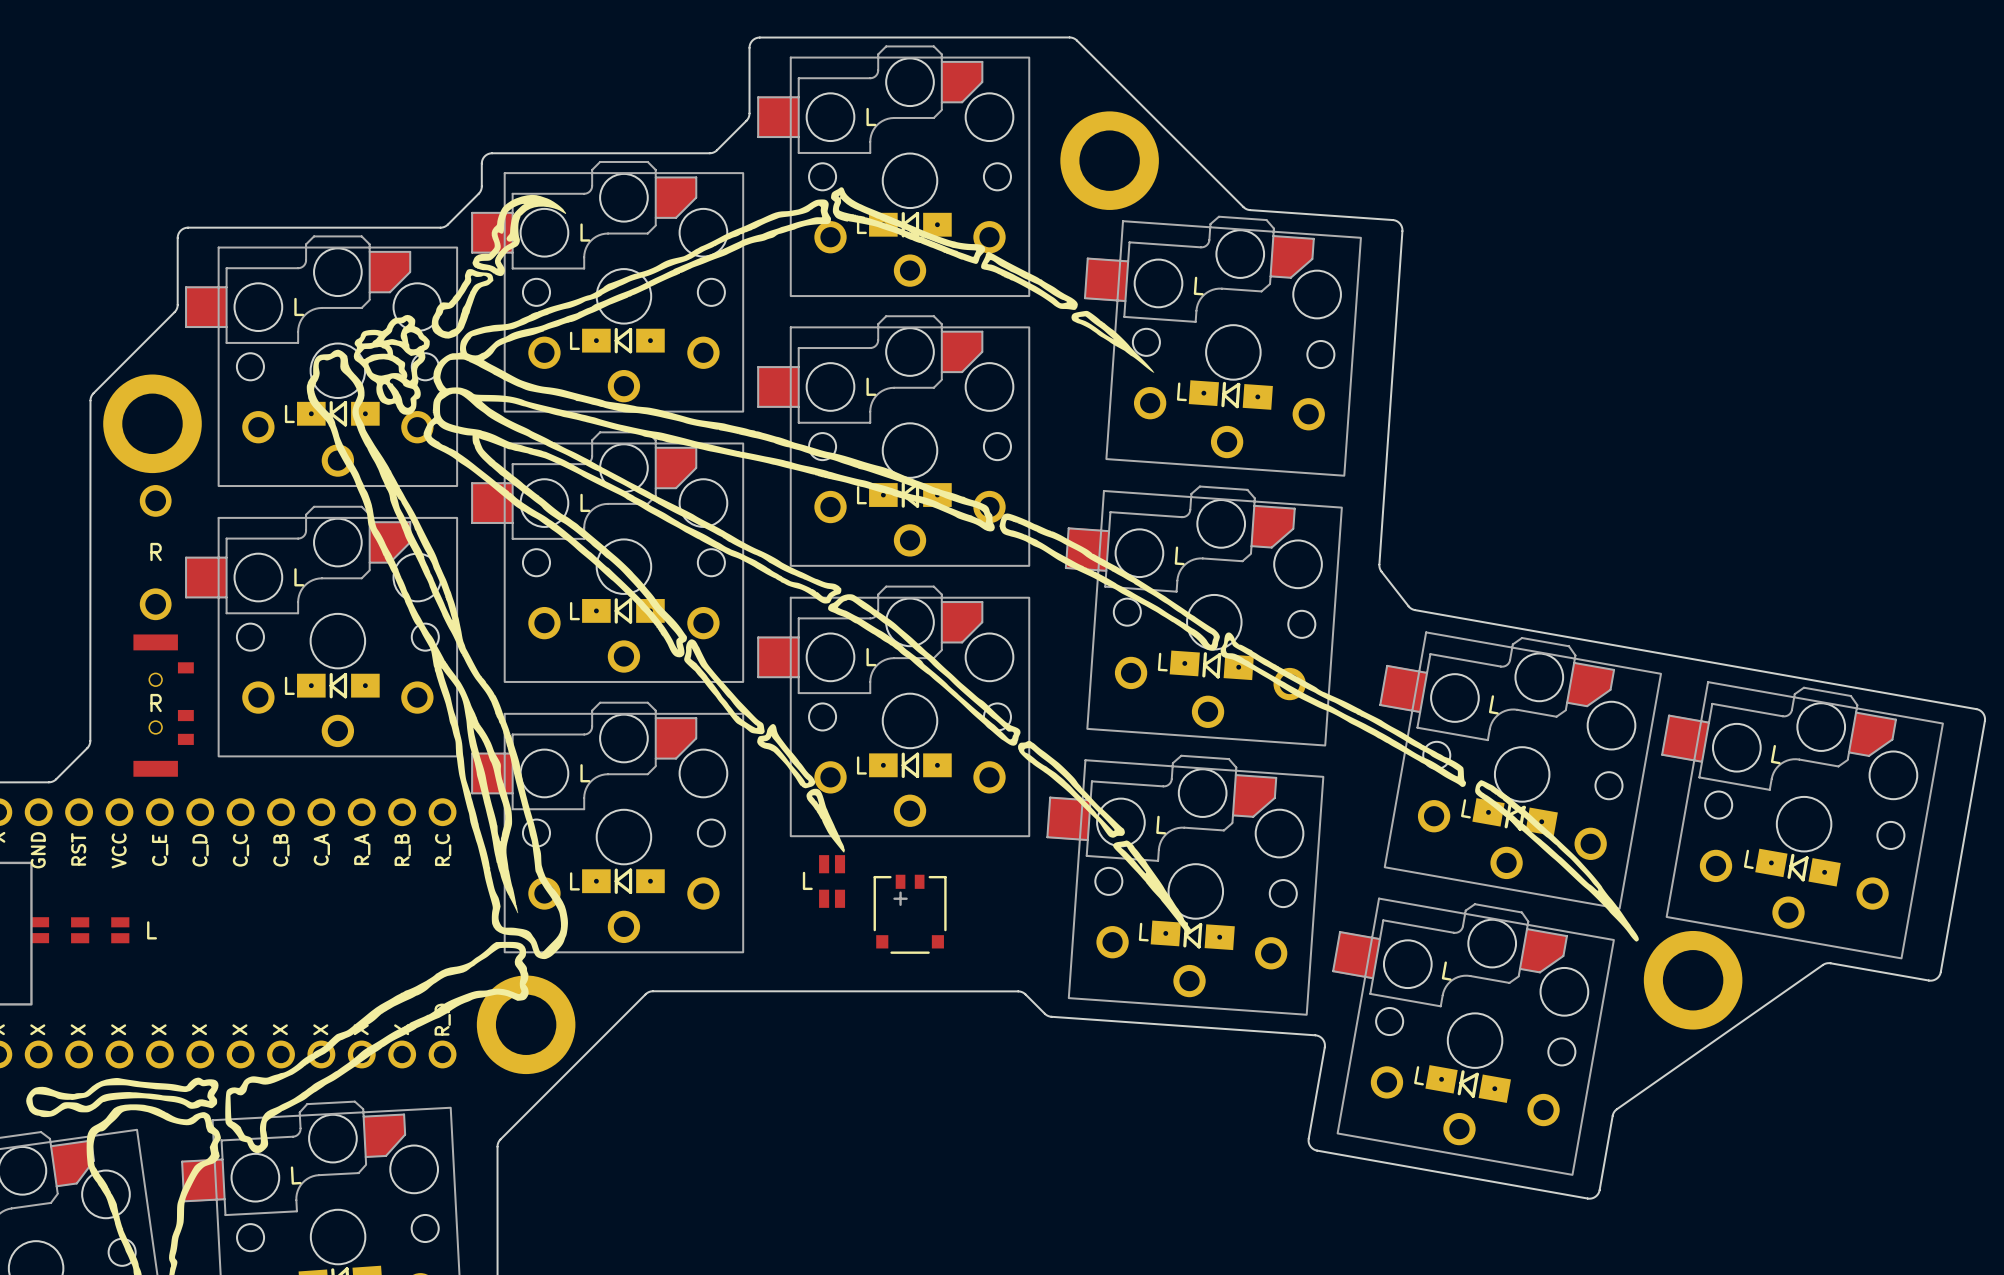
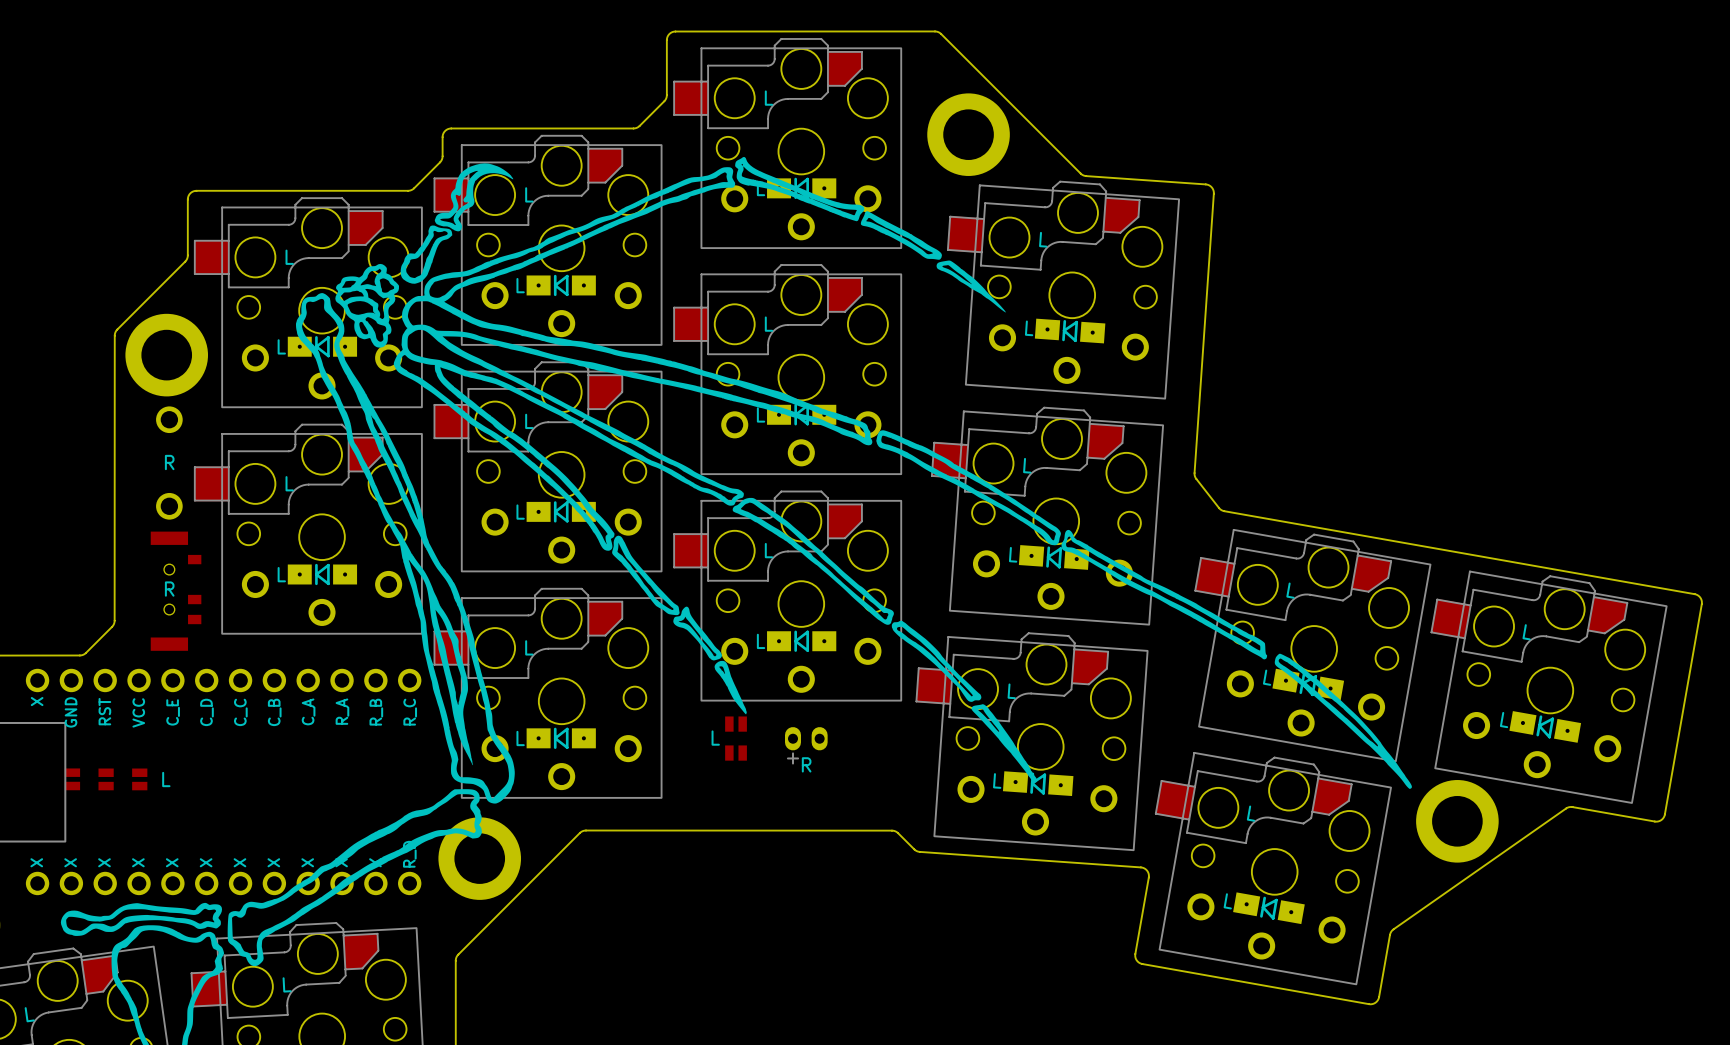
part: none -> (806, 738)
part: (910, 914) -> none

